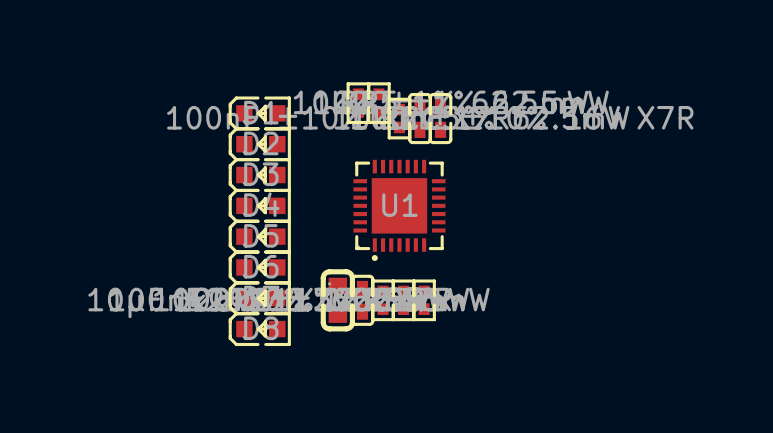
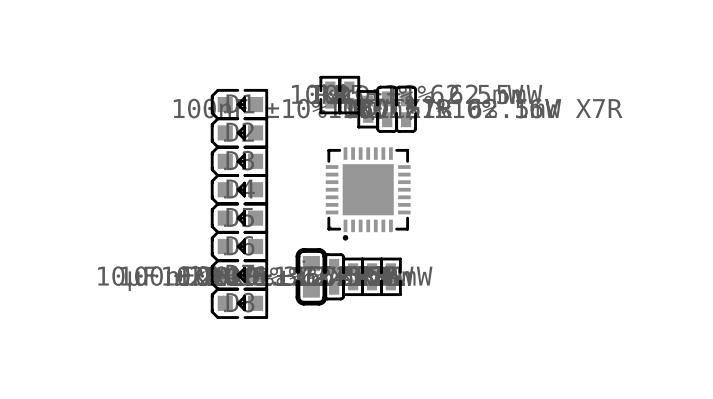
U1 name: U1 (399, 205) -> none

